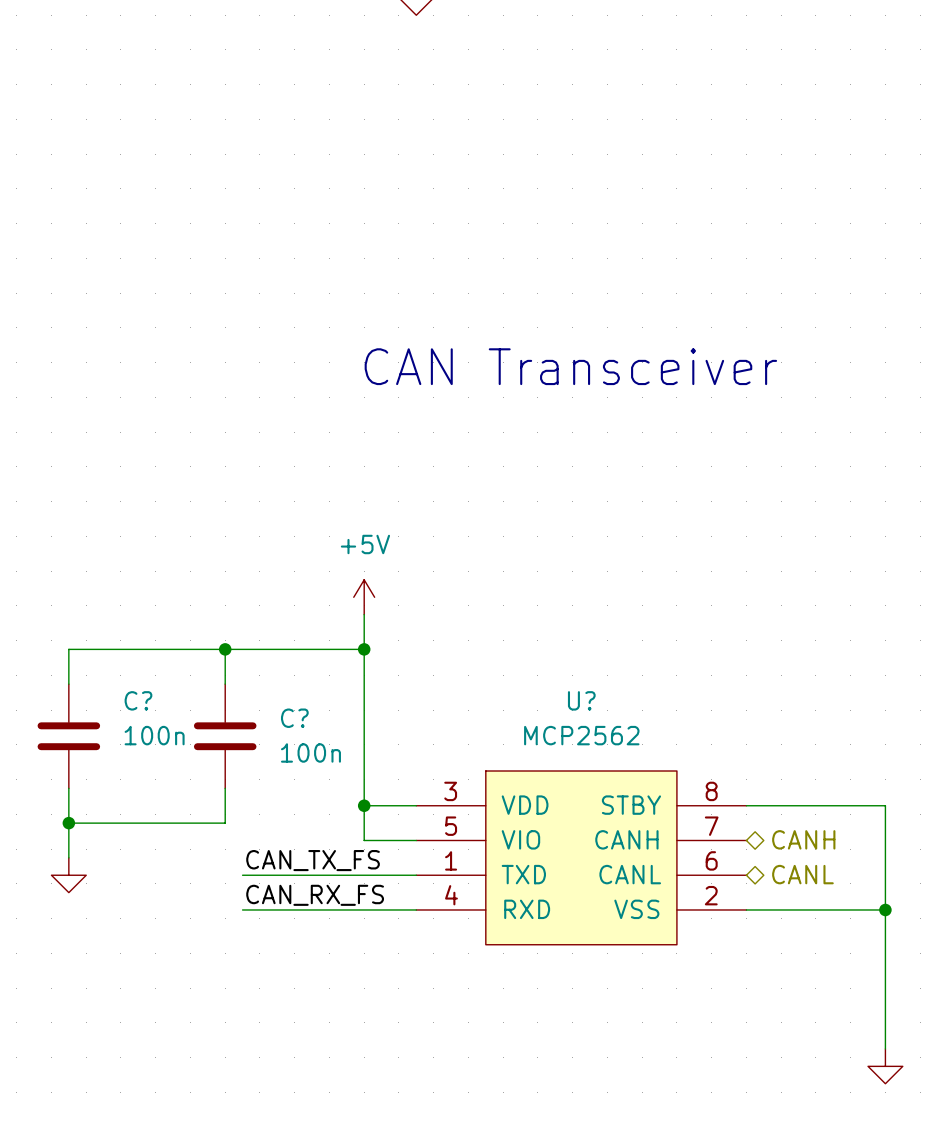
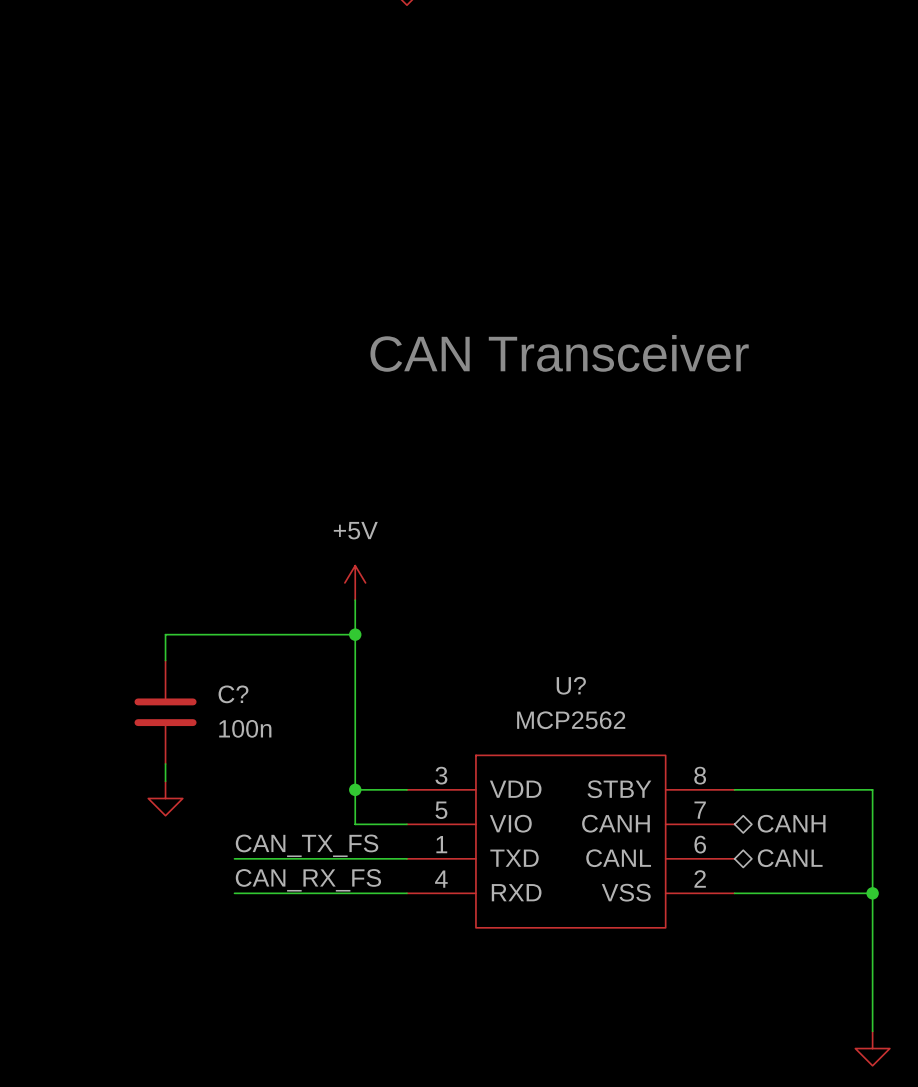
wire: (173, 649) (68, 649) (68, 684) -> (165, 634) (165, 660)
wire: (225, 649) (225, 684) -> none
junction: (225, 649) -> none
C?: none -> 100n (165, 712)
C?: 100n (68, 736) -> none
C?: 100n (225, 736) -> none
wire: none -> (165, 763) (165, 781)
wire: (68, 788) (68, 857) -> none
wire: (225, 788) (225, 823) (68, 823) -> none
junction: (68, 823) -> none
power symbol position: (68, 875) -> (165, 798)

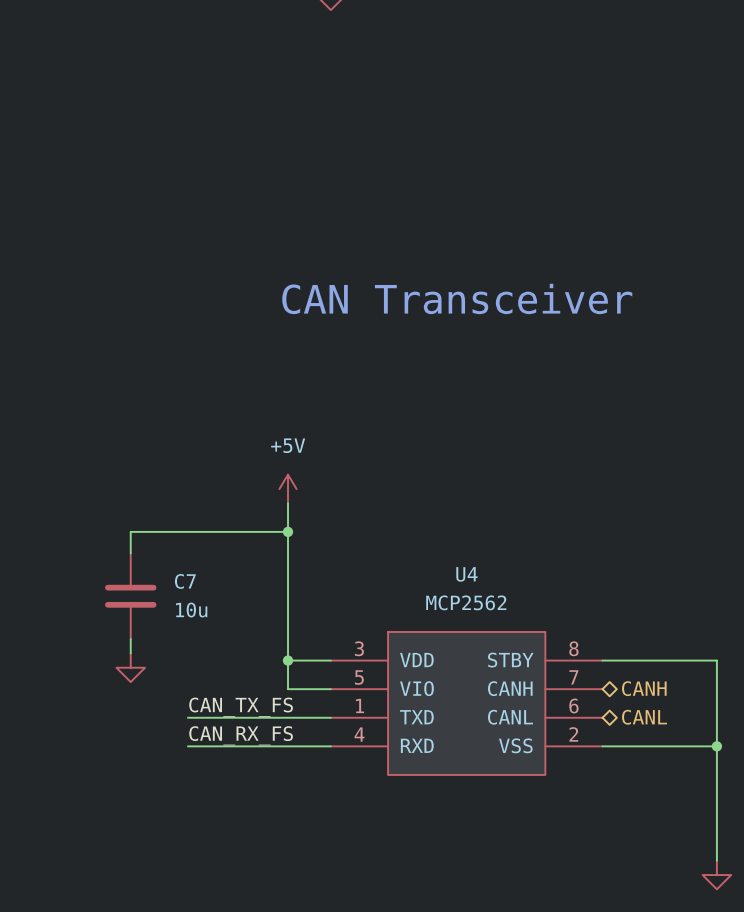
U? name: U? (571, 685) -> U4 (466, 574)
C? name: C? (233, 694) -> C7 (185, 581)
C? value: 100n (245, 728) -> 10u (191, 610)

